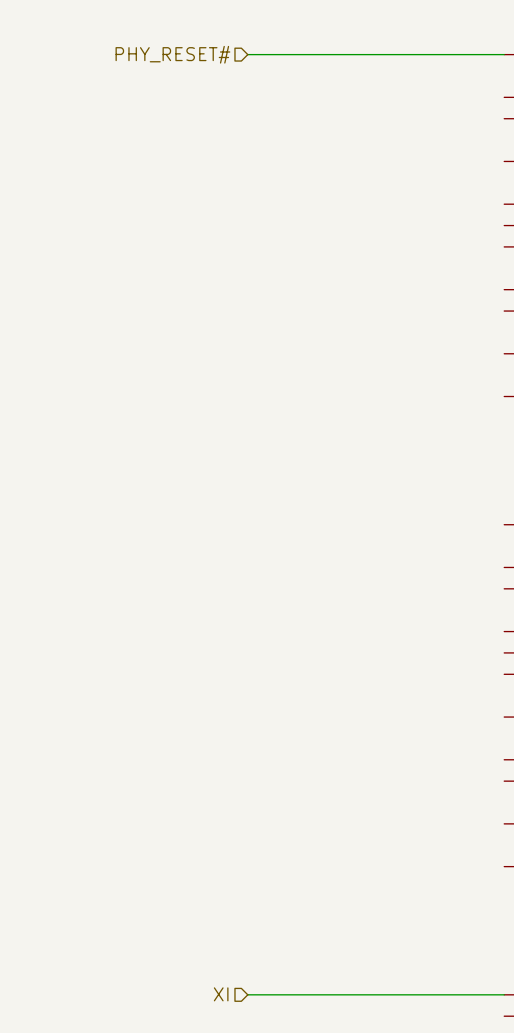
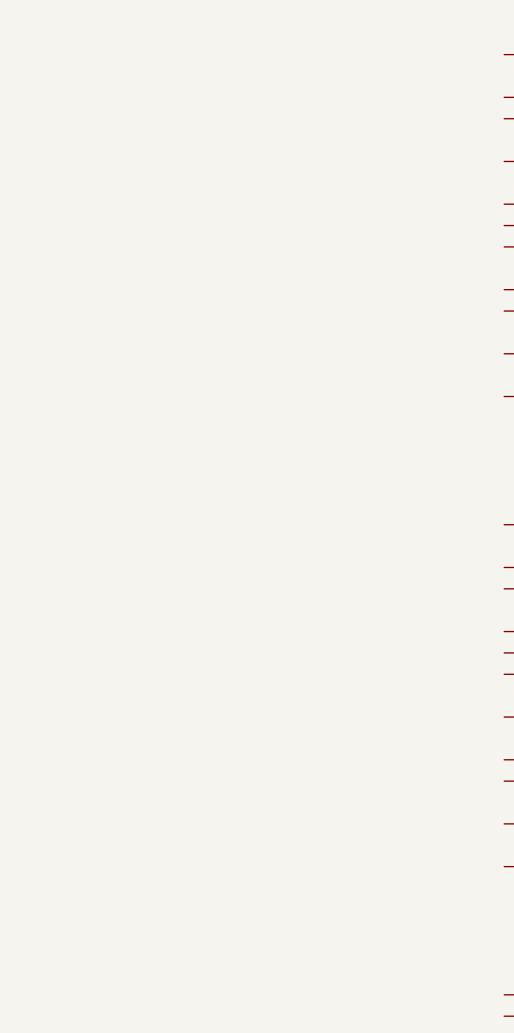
hierarchical label: PHY_RESET# (172, 54) -> none
wire: (247, 54) (504, 54) -> none
hierarchical label: XI (221, 994) -> none
wire: (247, 994) (504, 994) -> none

